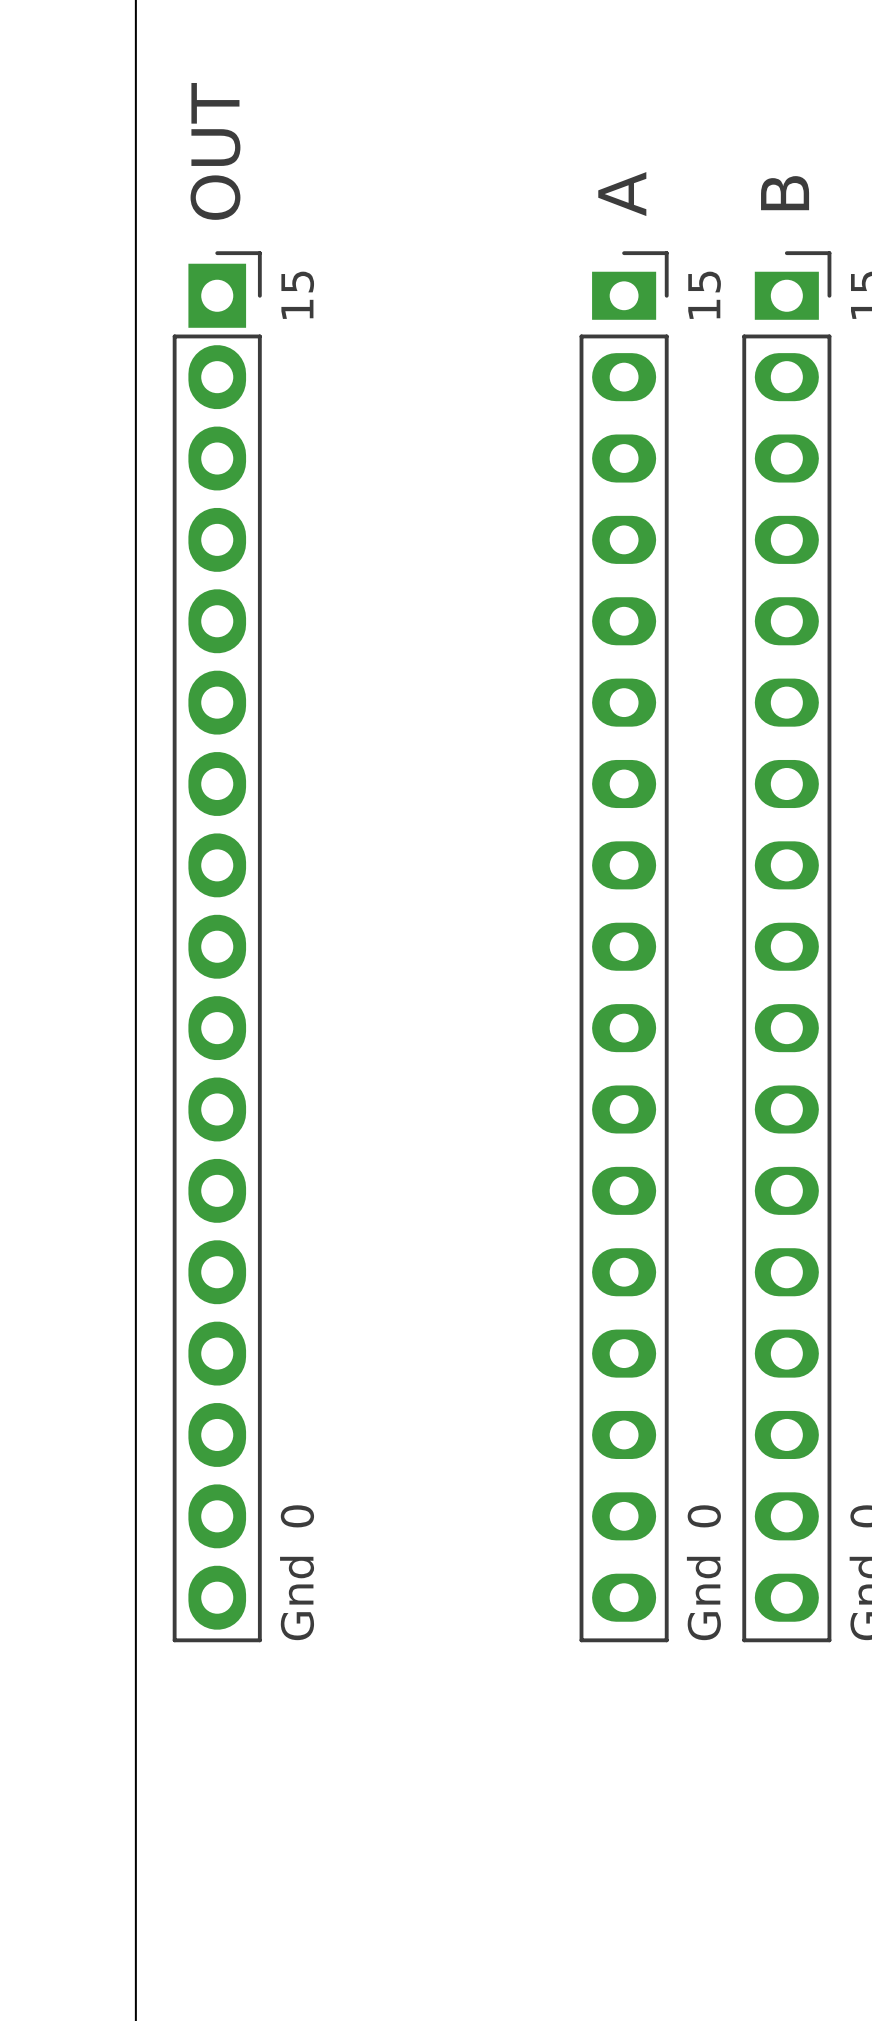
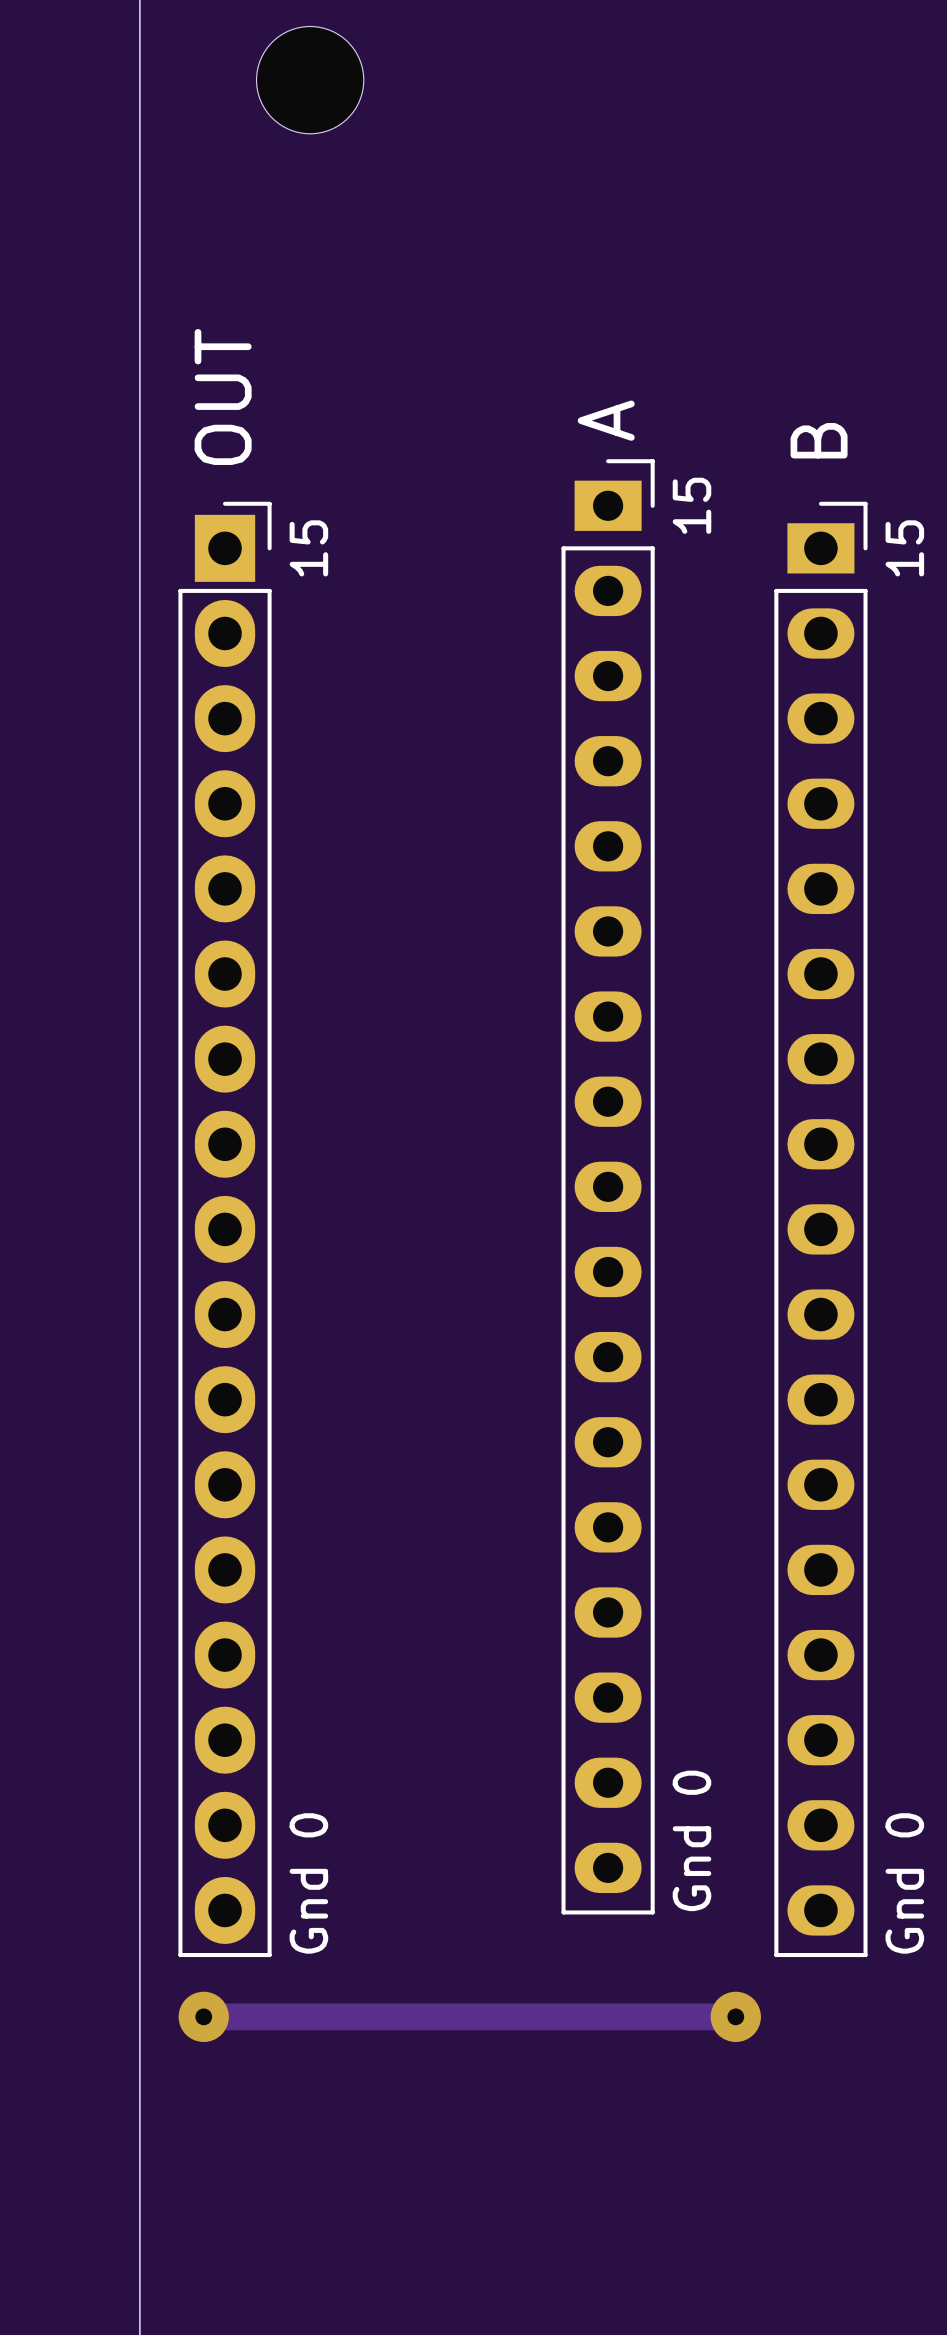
text position: A (622, 194) -> A (606, 420)
text position: 15 (704, 295) -> 15 (691, 505)
part position: (624, 946) -> (608, 1186)
text position: 0 (704, 1516) -> 0 (691, 1782)
text position: Gnd (703, 1598) -> Gnd (691, 1868)
track: none -> (203, 2016) (735, 2016)
via: none -> (203, 2016)
via: none -> (735, 2016)

